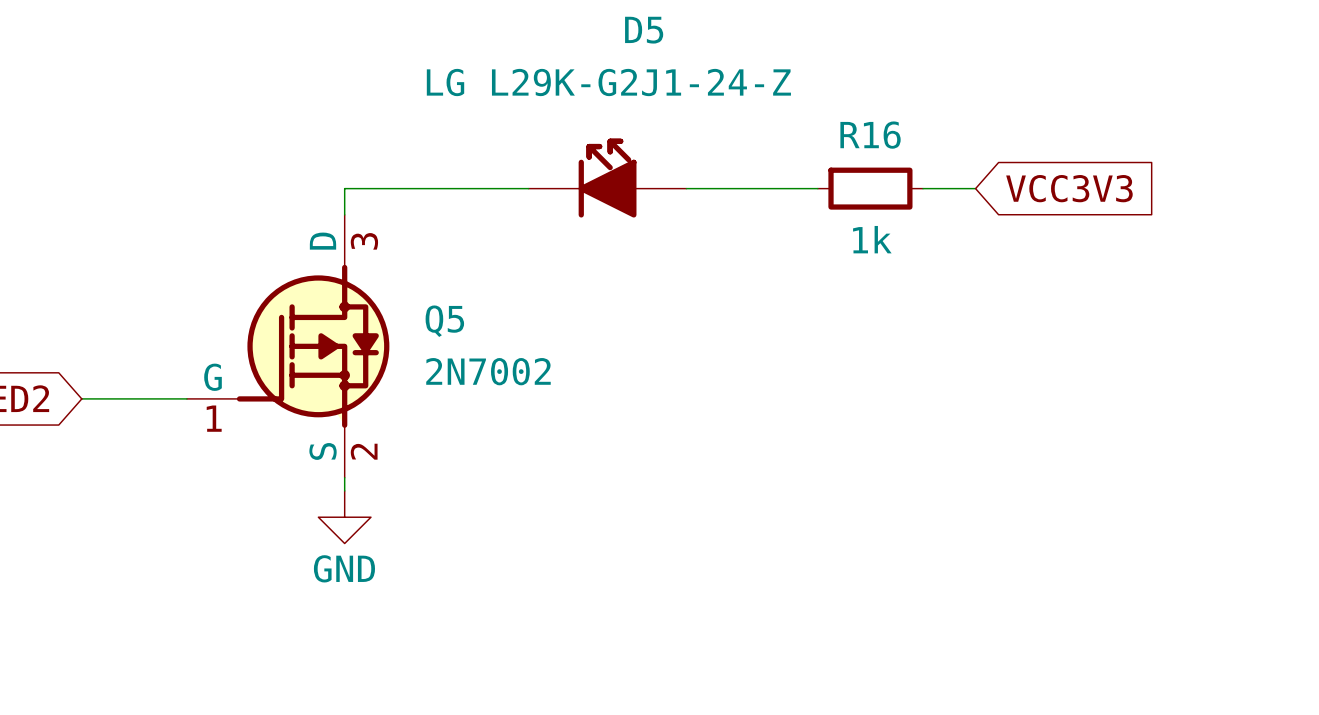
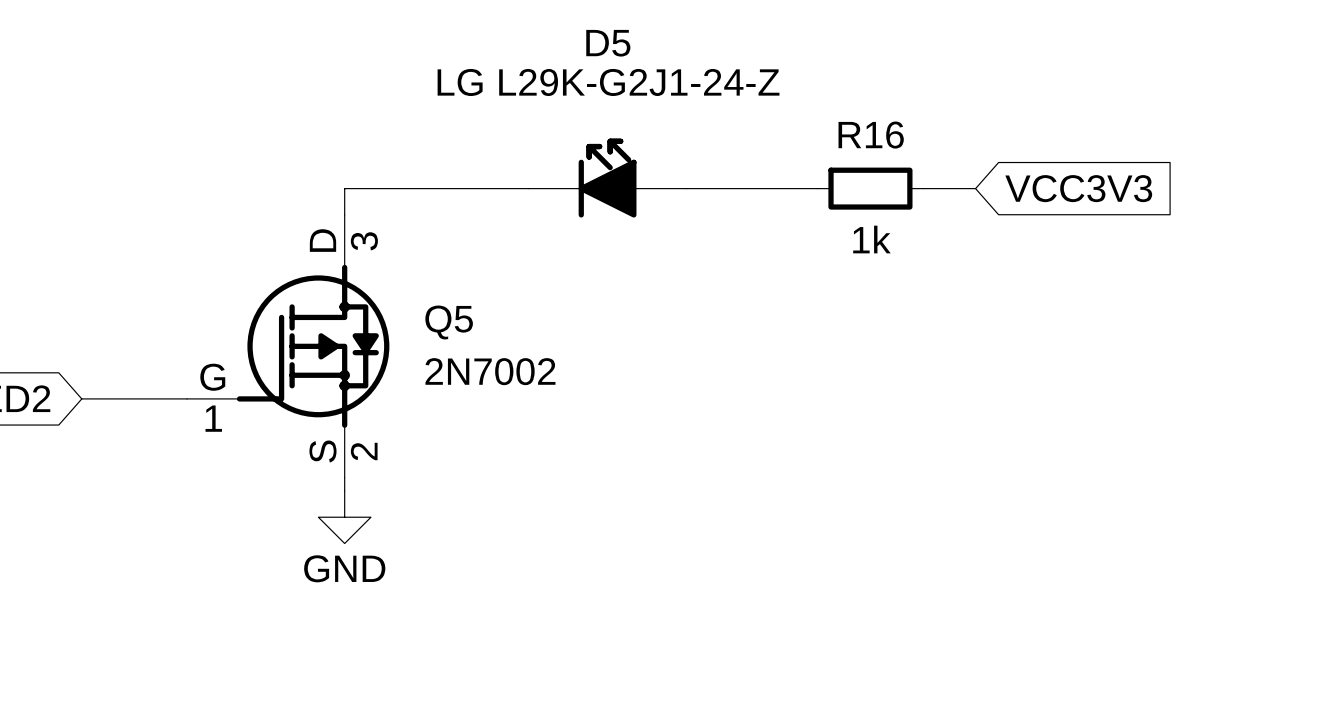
D5 name position: D5 (644, 30) -> D5 (608, 43)

